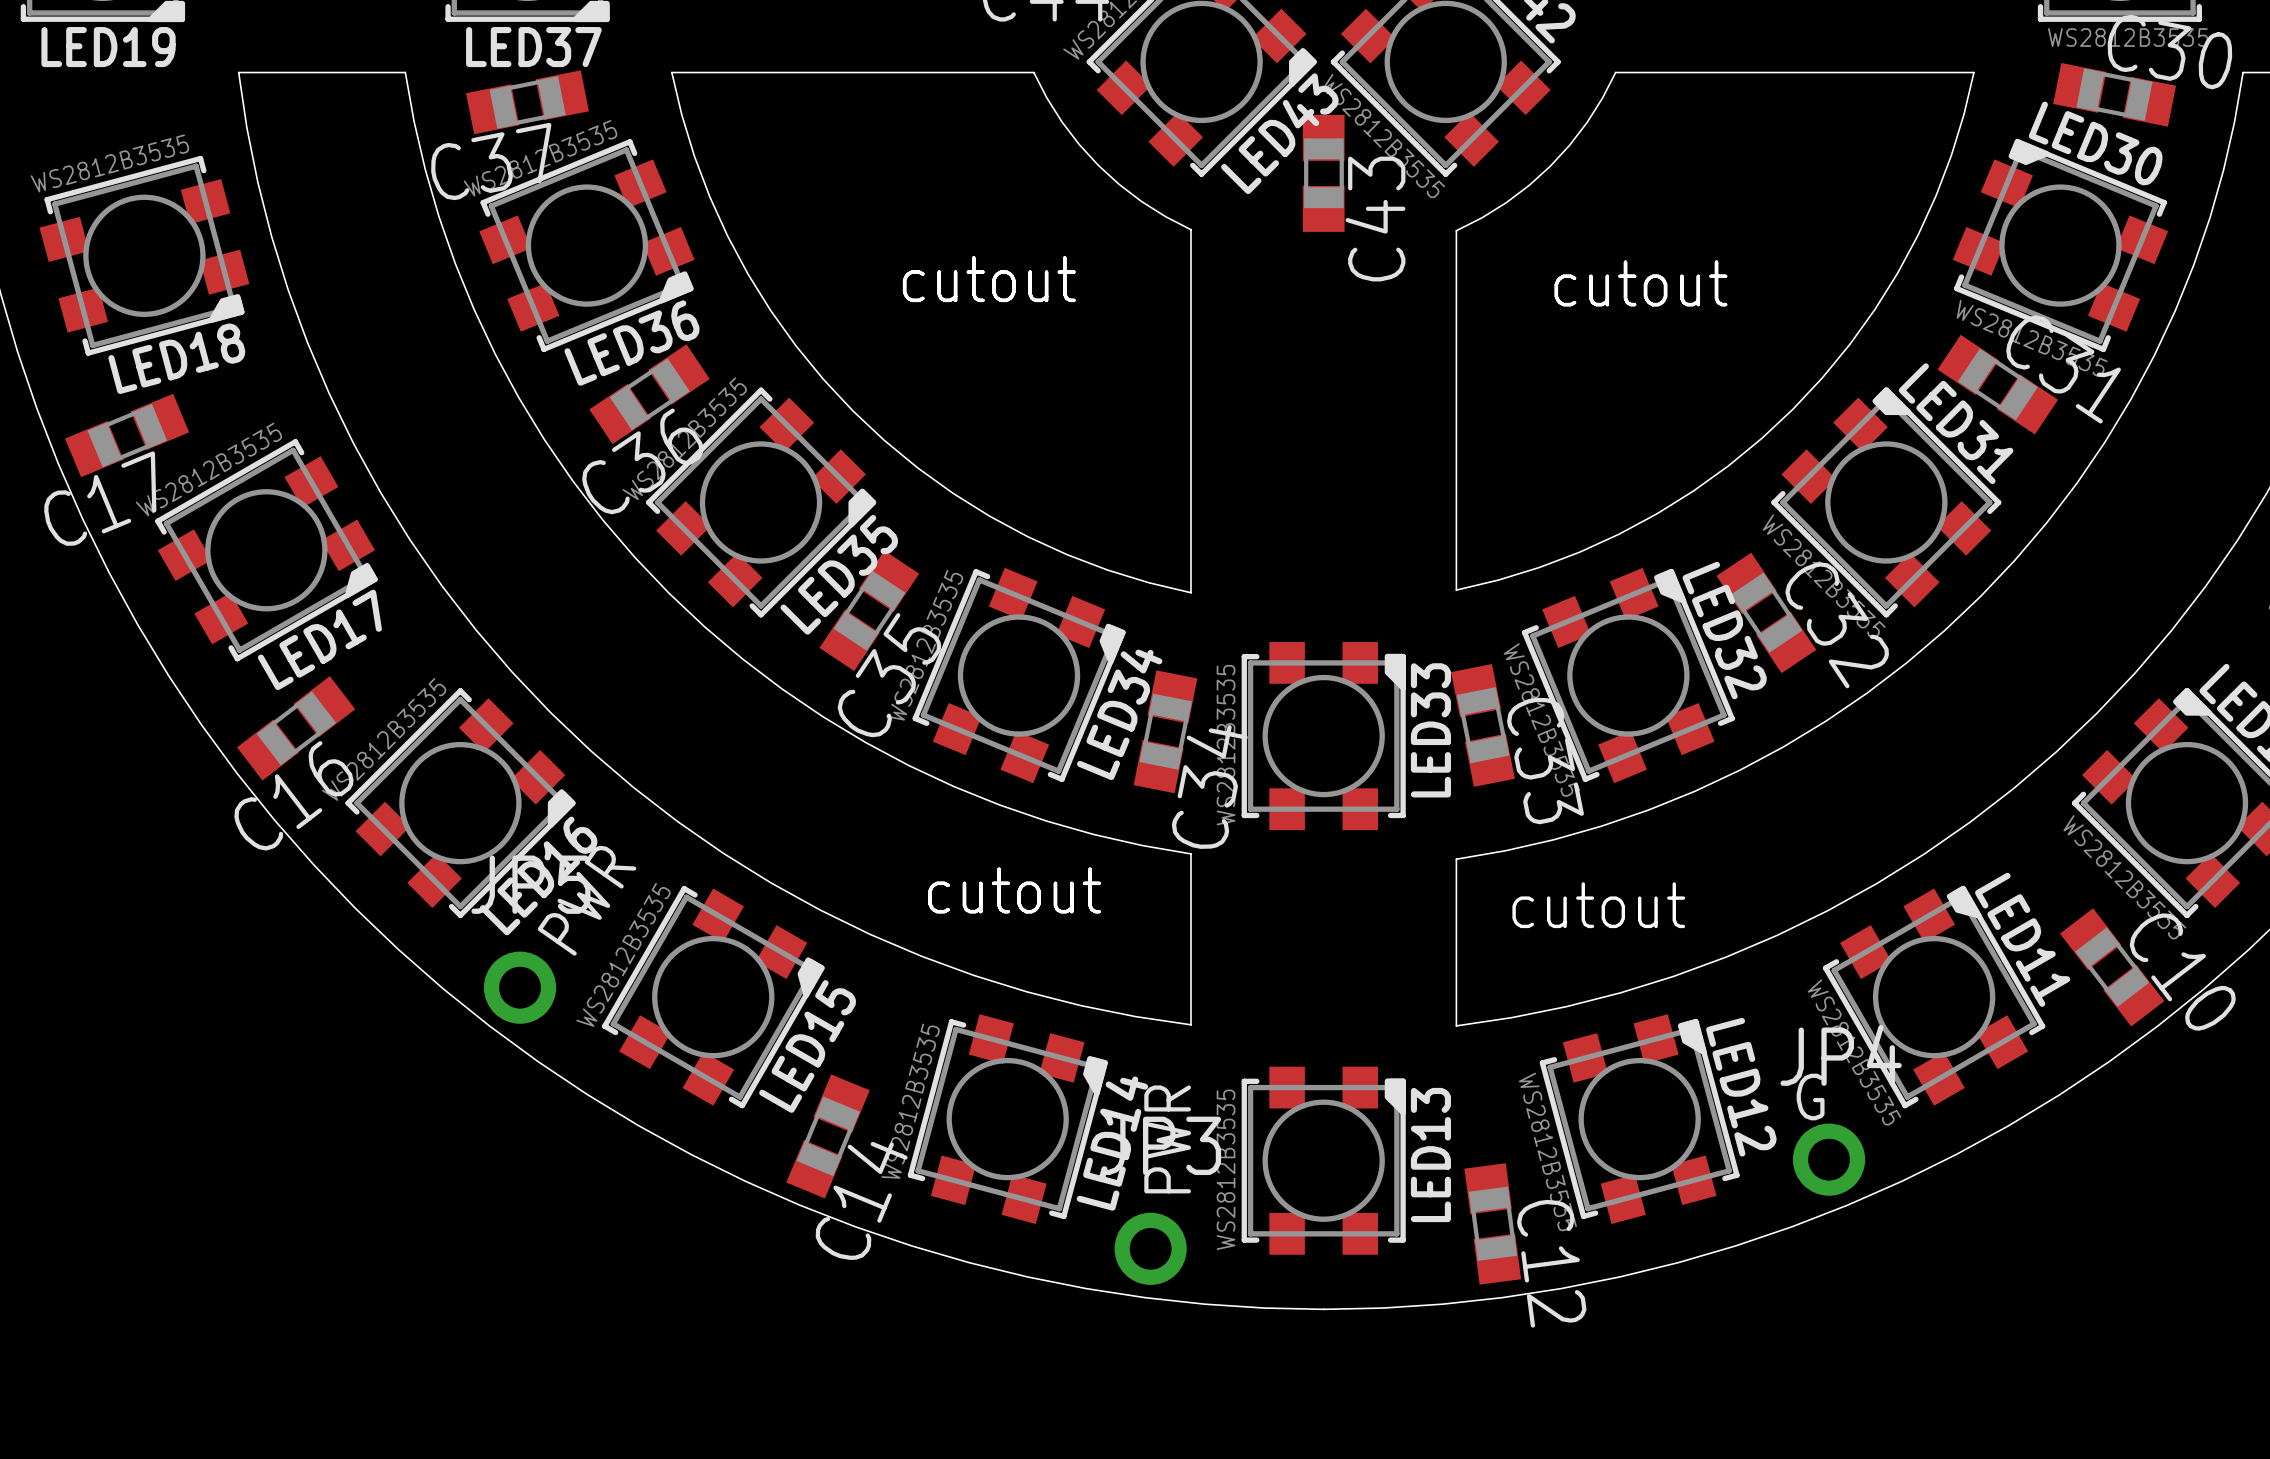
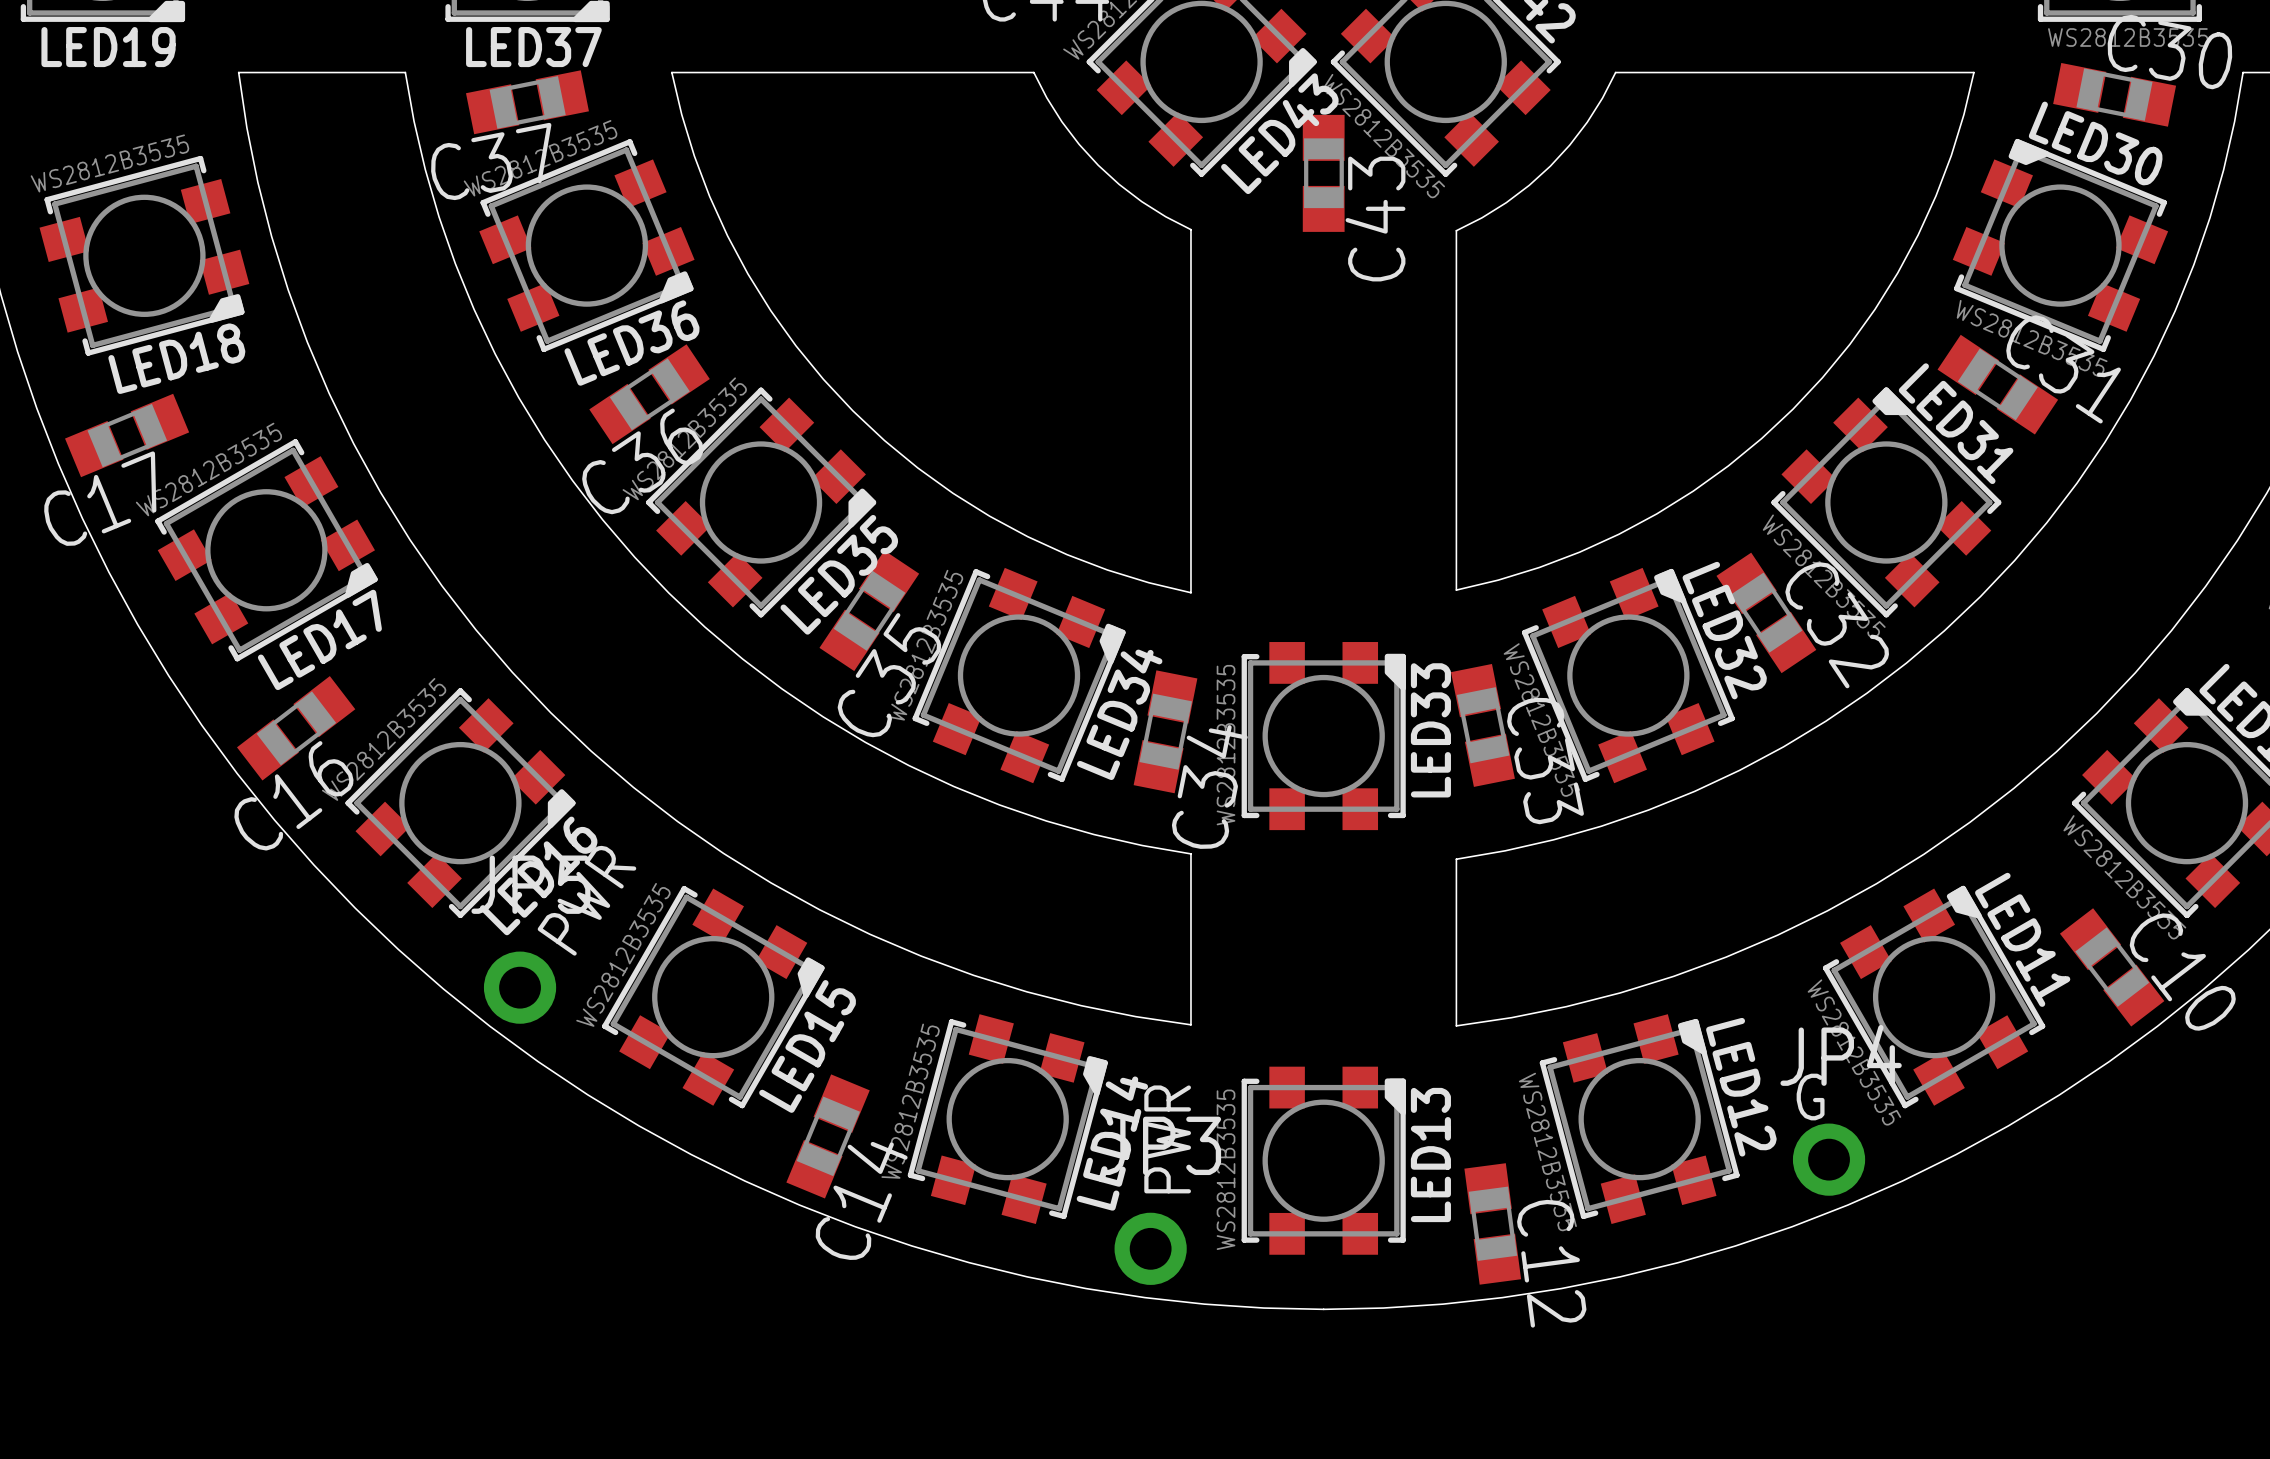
text: cutout (989, 279) -> none
text: cutout (1640, 283) -> none
text: cutout (1014, 890) -> none
text: cutout (1598, 905) -> none

